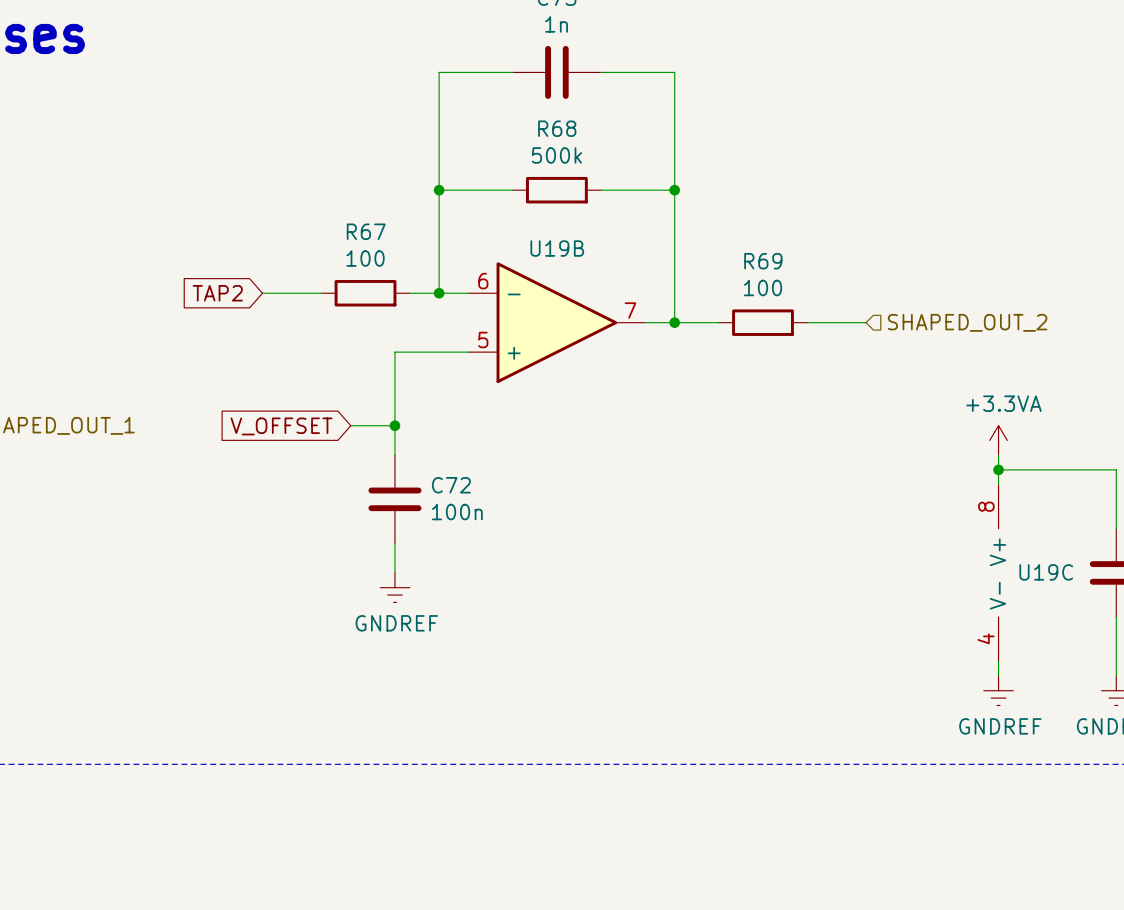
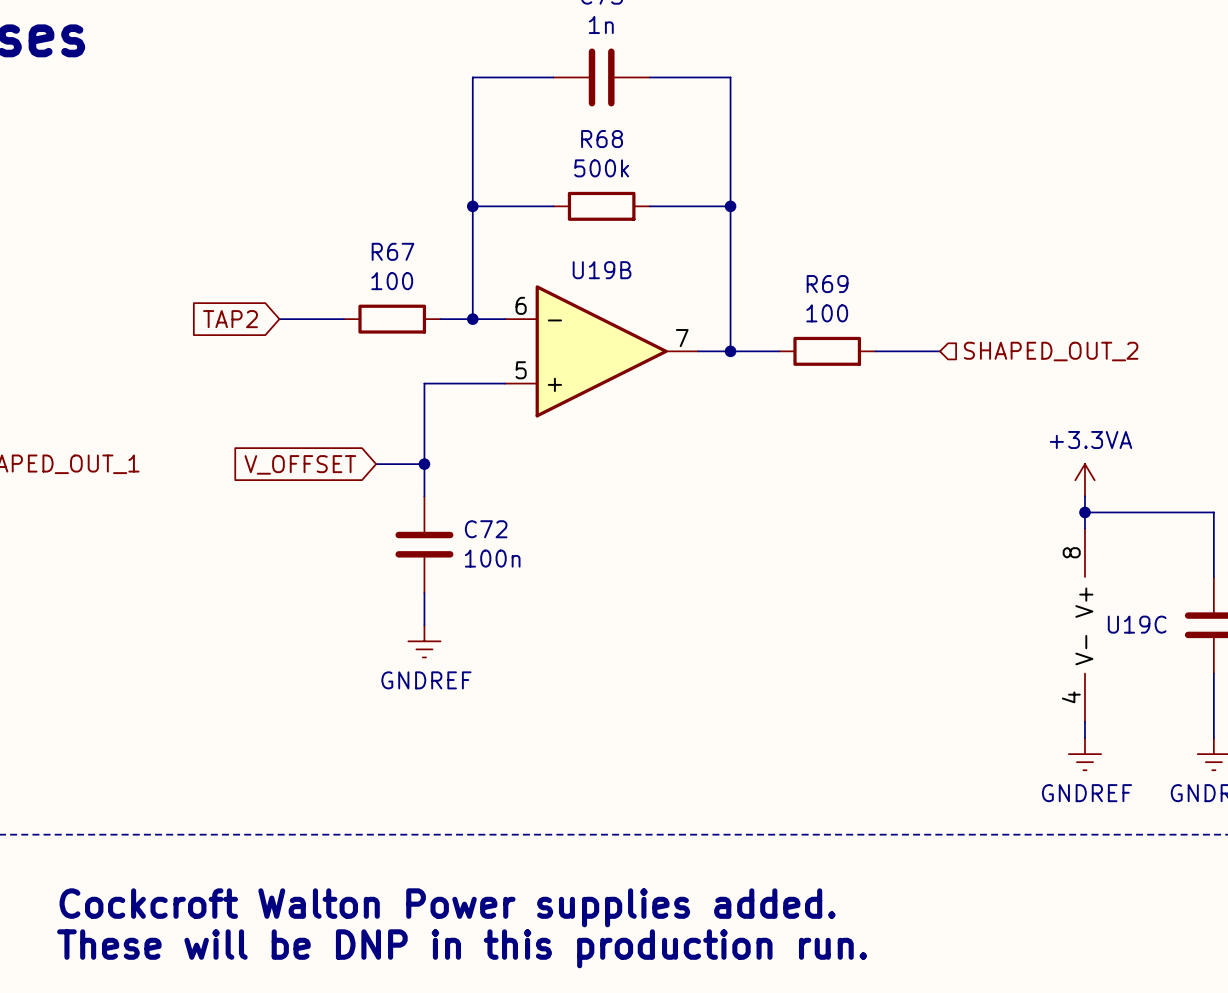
text: none -> Cockcroft Walton Power supplies added. (447, 907)
text: none -> These will be DNP in this production run. (462, 948)

